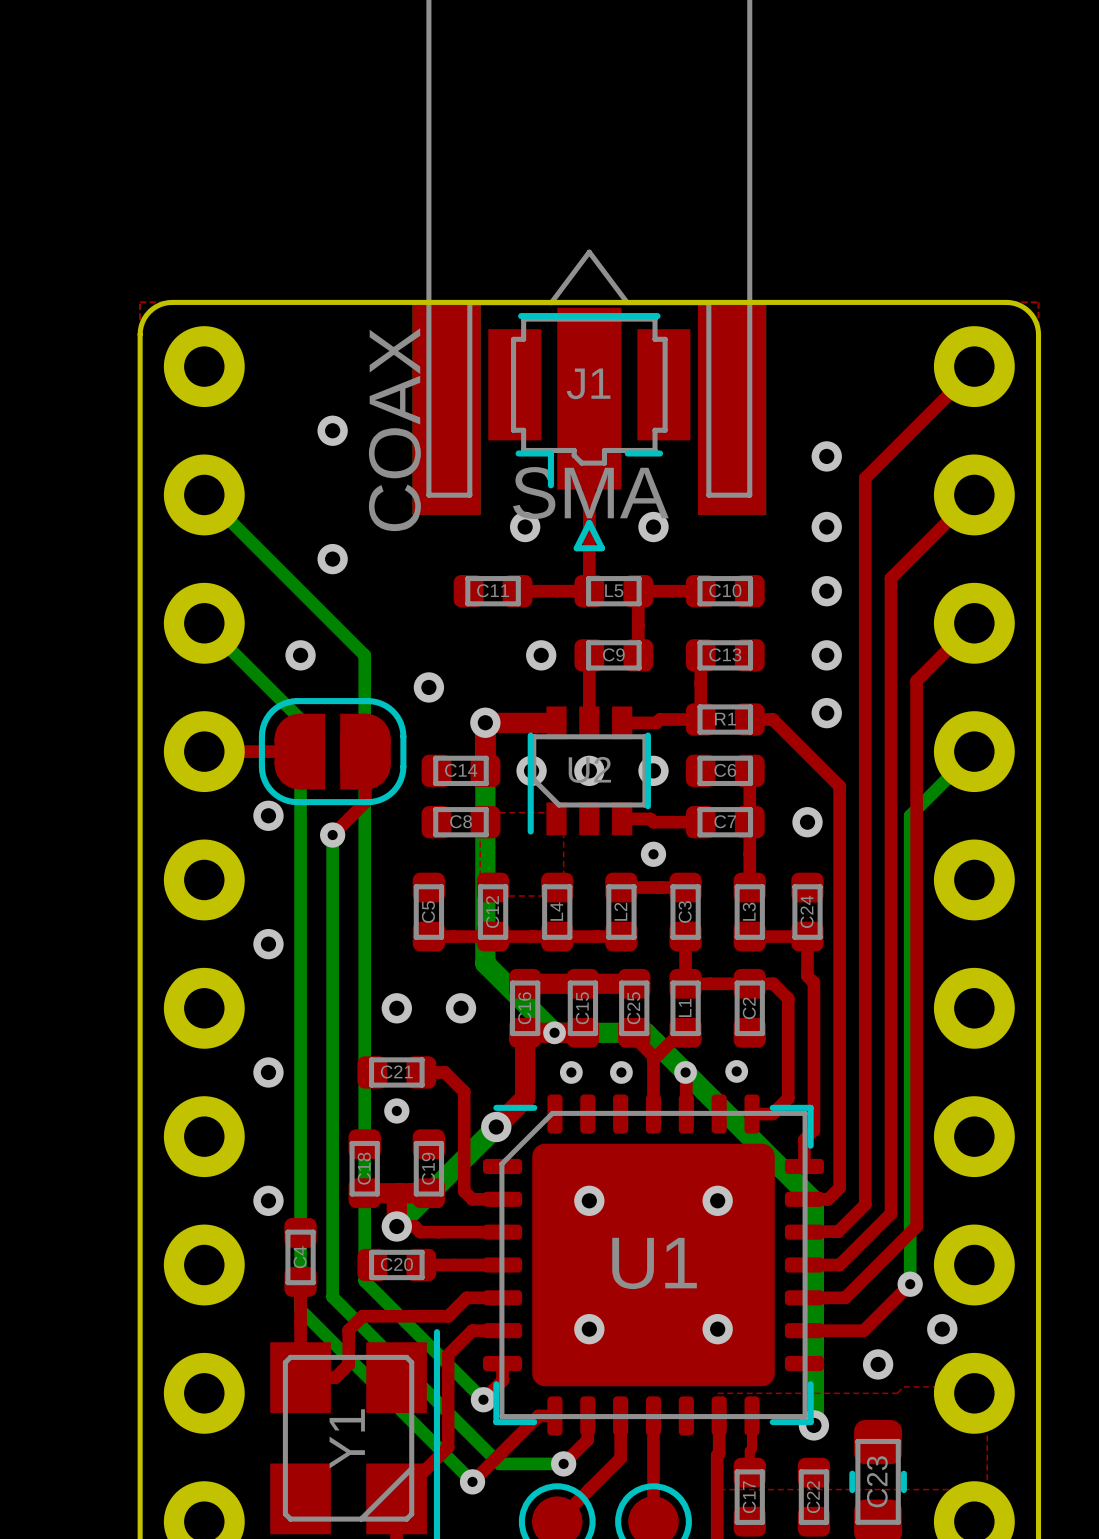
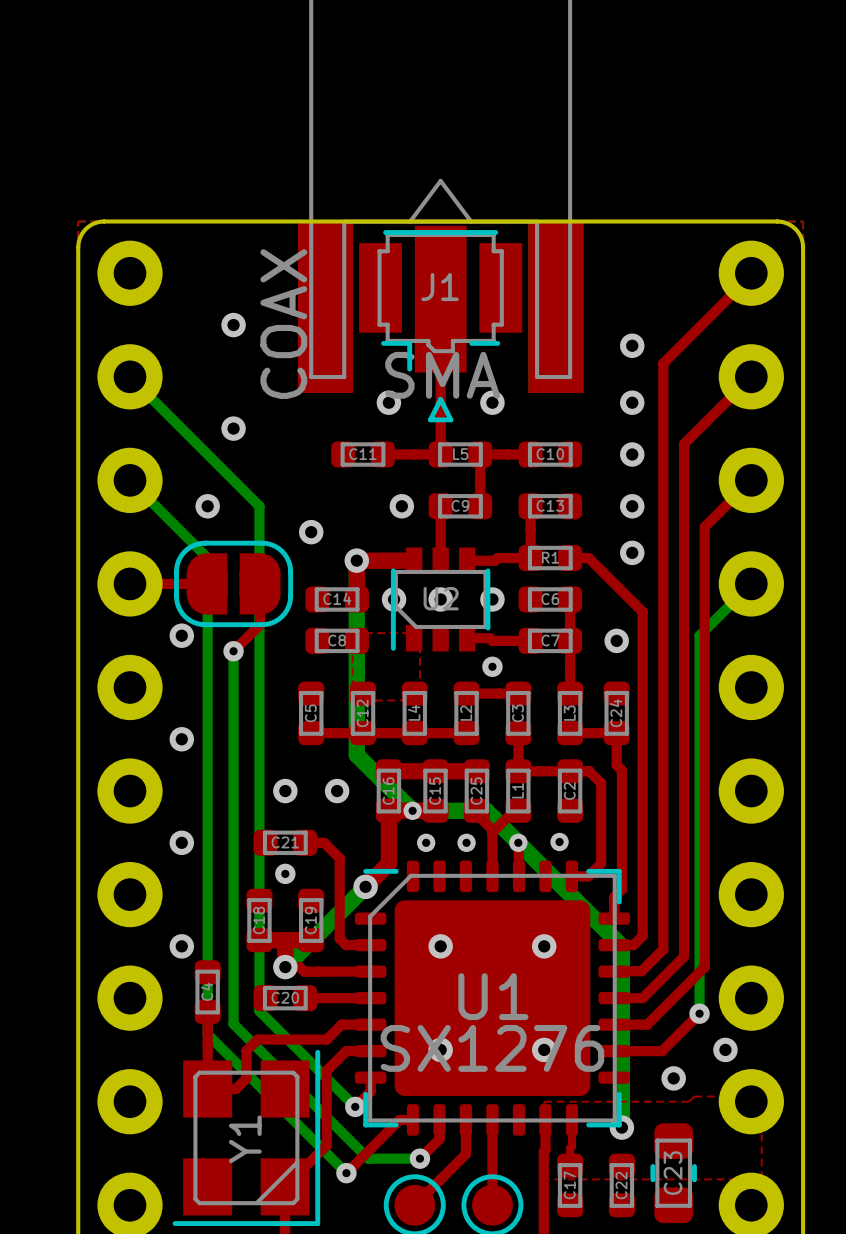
U1 value: none -> SX1276 (492, 1048)

